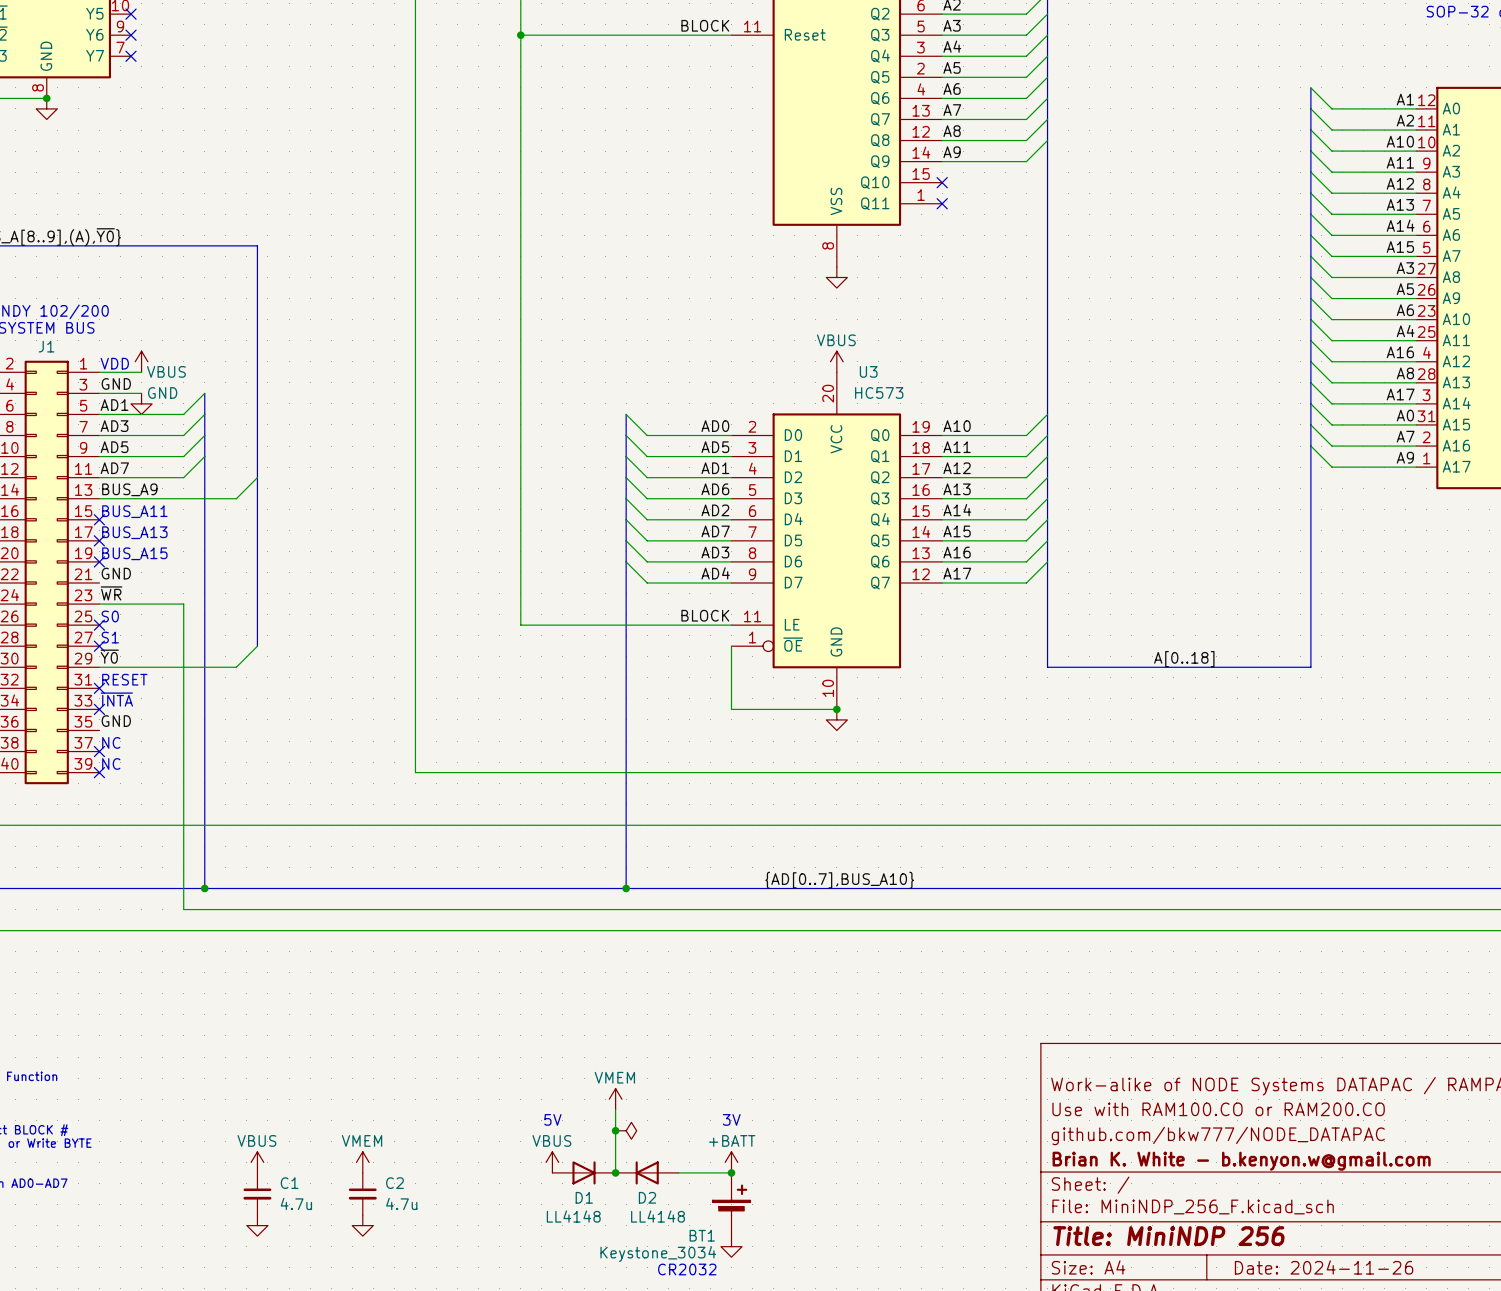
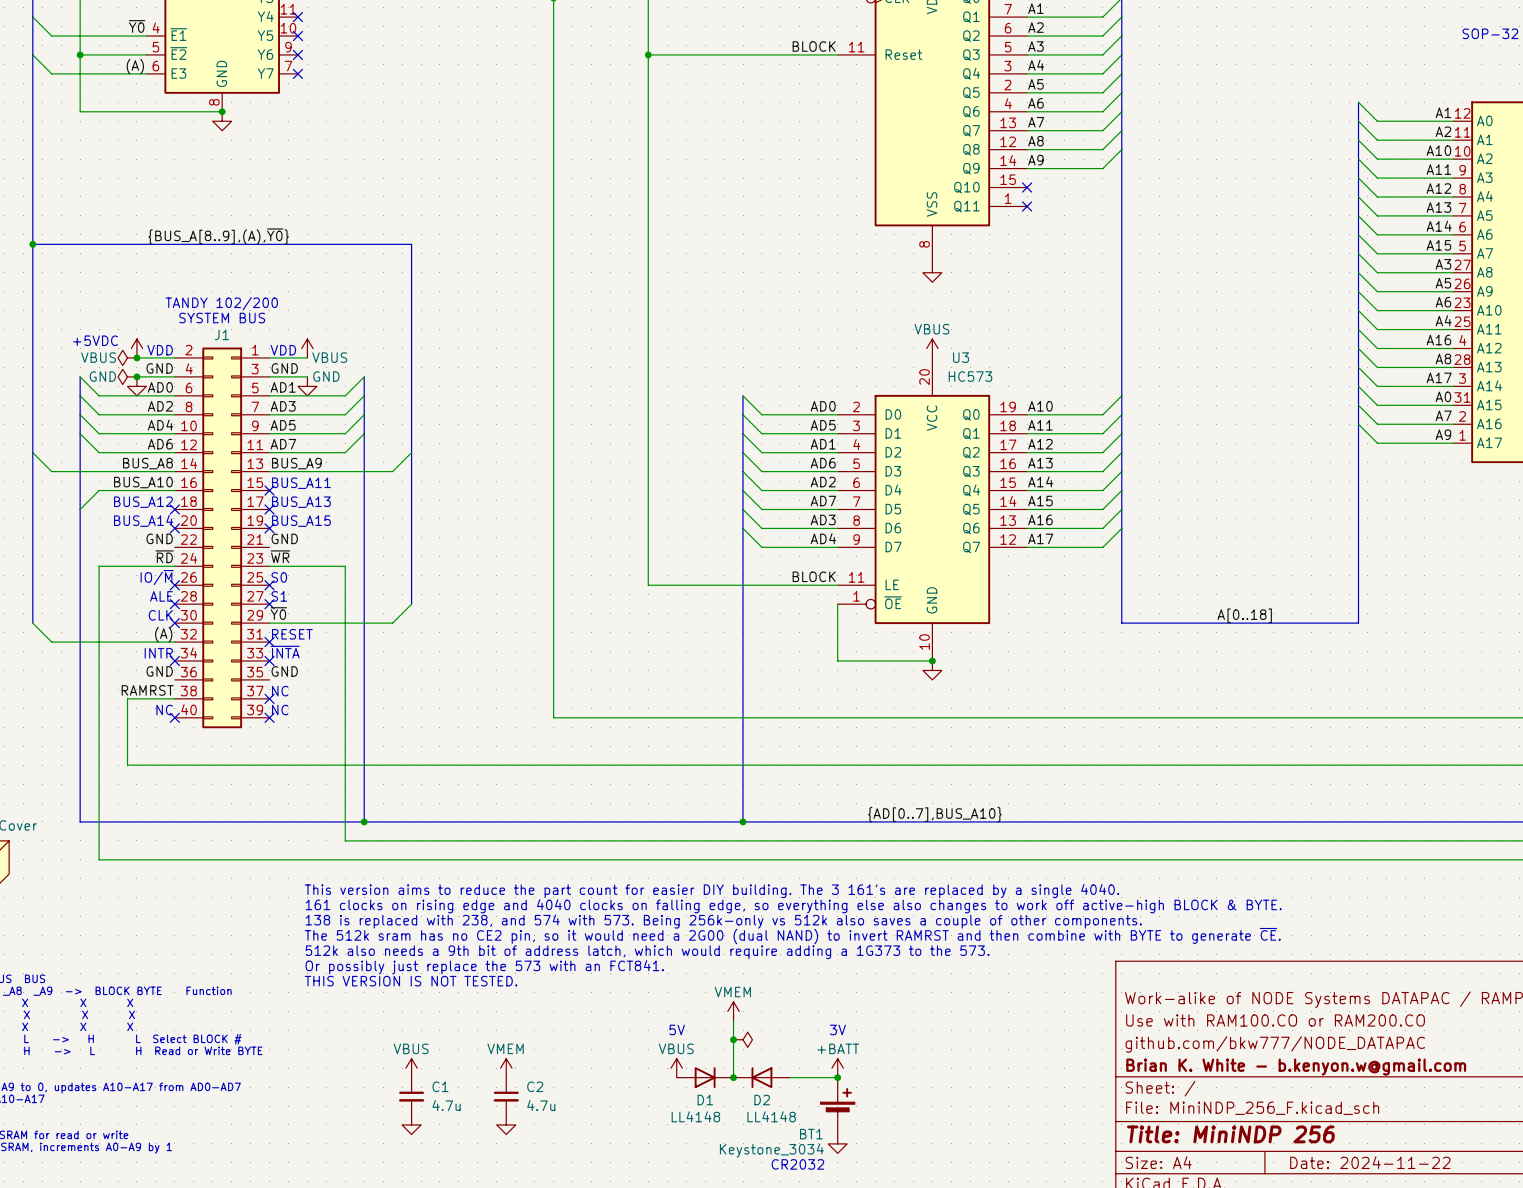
text: none -> This version aims to reduce the part count for easier DIY building. The 3 161's are replaced by a single 4040. (712, 891)
text: none -> 161 clocks on rising edge and 4040 clocks on falling edge, so everything else also changes to work off active-high BLOCK & BYTE. (793, 906)
text: none -> 138 is replaced with 238, and 574 with 573. Being 256k-only vs 512k also saves a couple of other components. (723, 921)
text: none -> The 512k sram has no CE2 pin, so it would need a 2G00 (dual NAND) to invert RAMRST and then combine with BYTE to generate ~{CE}. (792, 936)
text: none -> 512k also needs a 9th bit of address latch, which would require adding a 1G373 to the 573. (647, 952)
text: none -> Or possibly just replace the 573 with an FCT841. (484, 967)
text: none -> THIS VERSION IS NOT TESTED. (411, 981)
title block: Date: 2024-11-26 (1324, 1267) -> Date: 2024-11-22 (1370, 1162)

